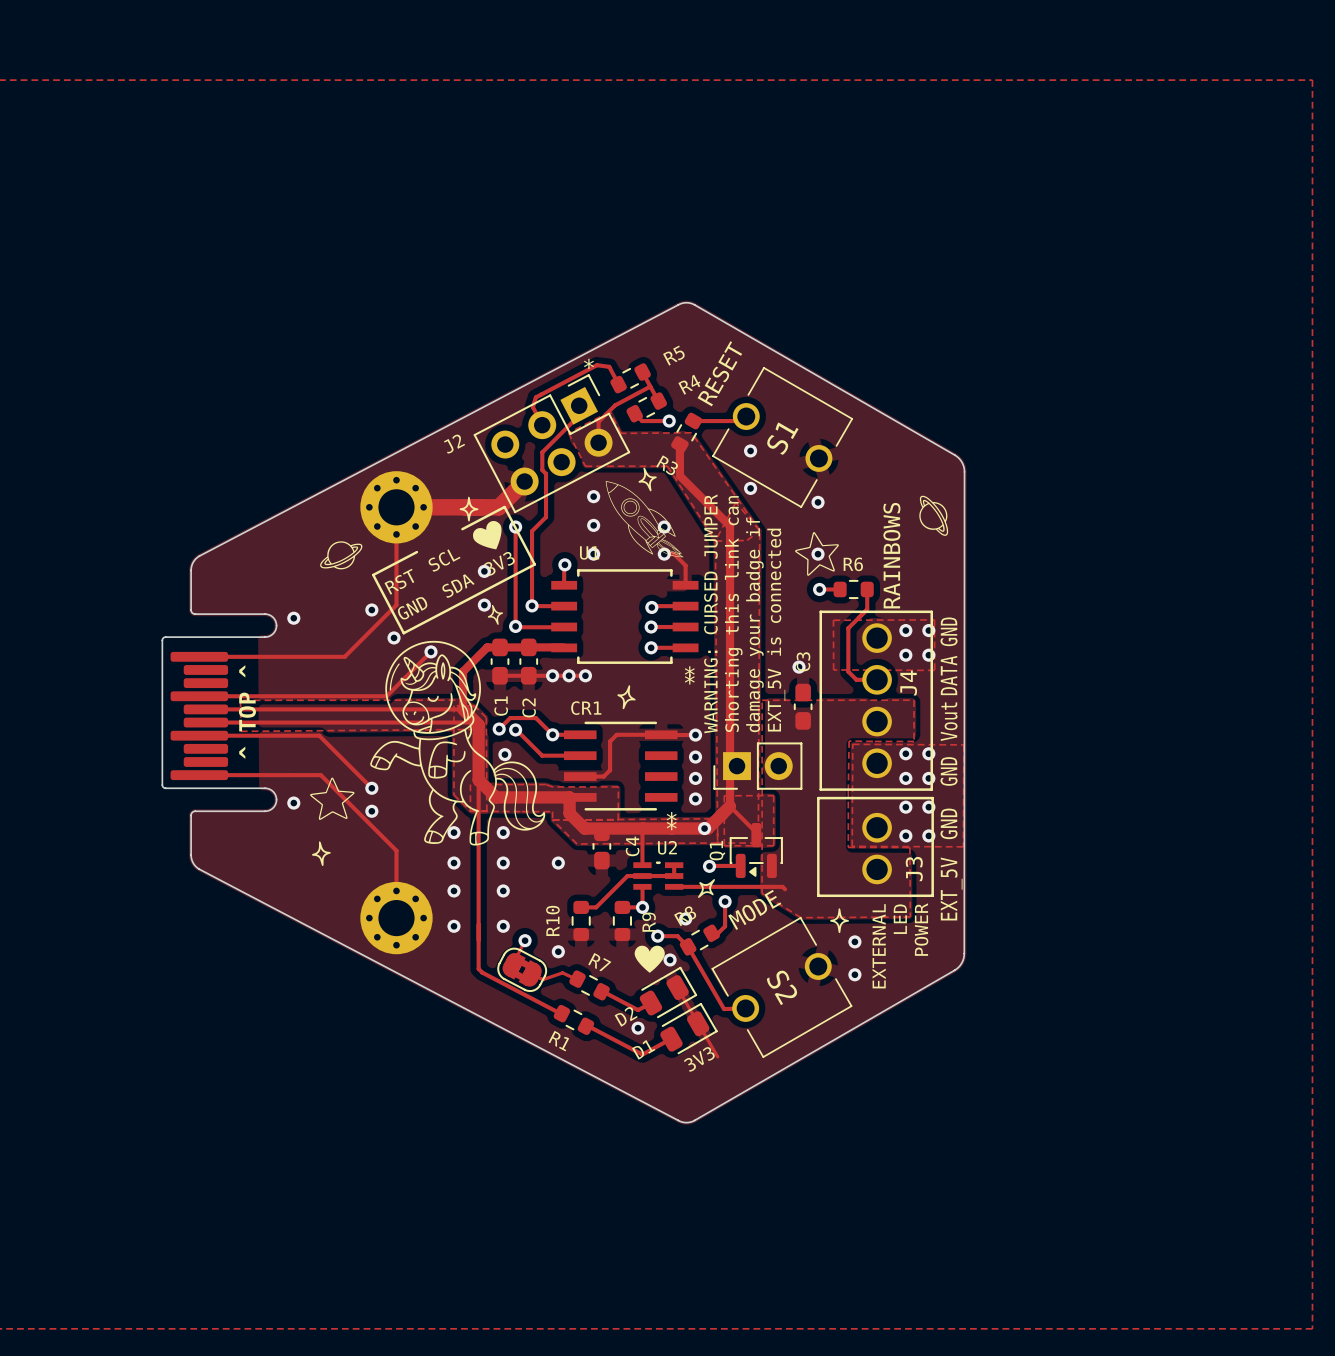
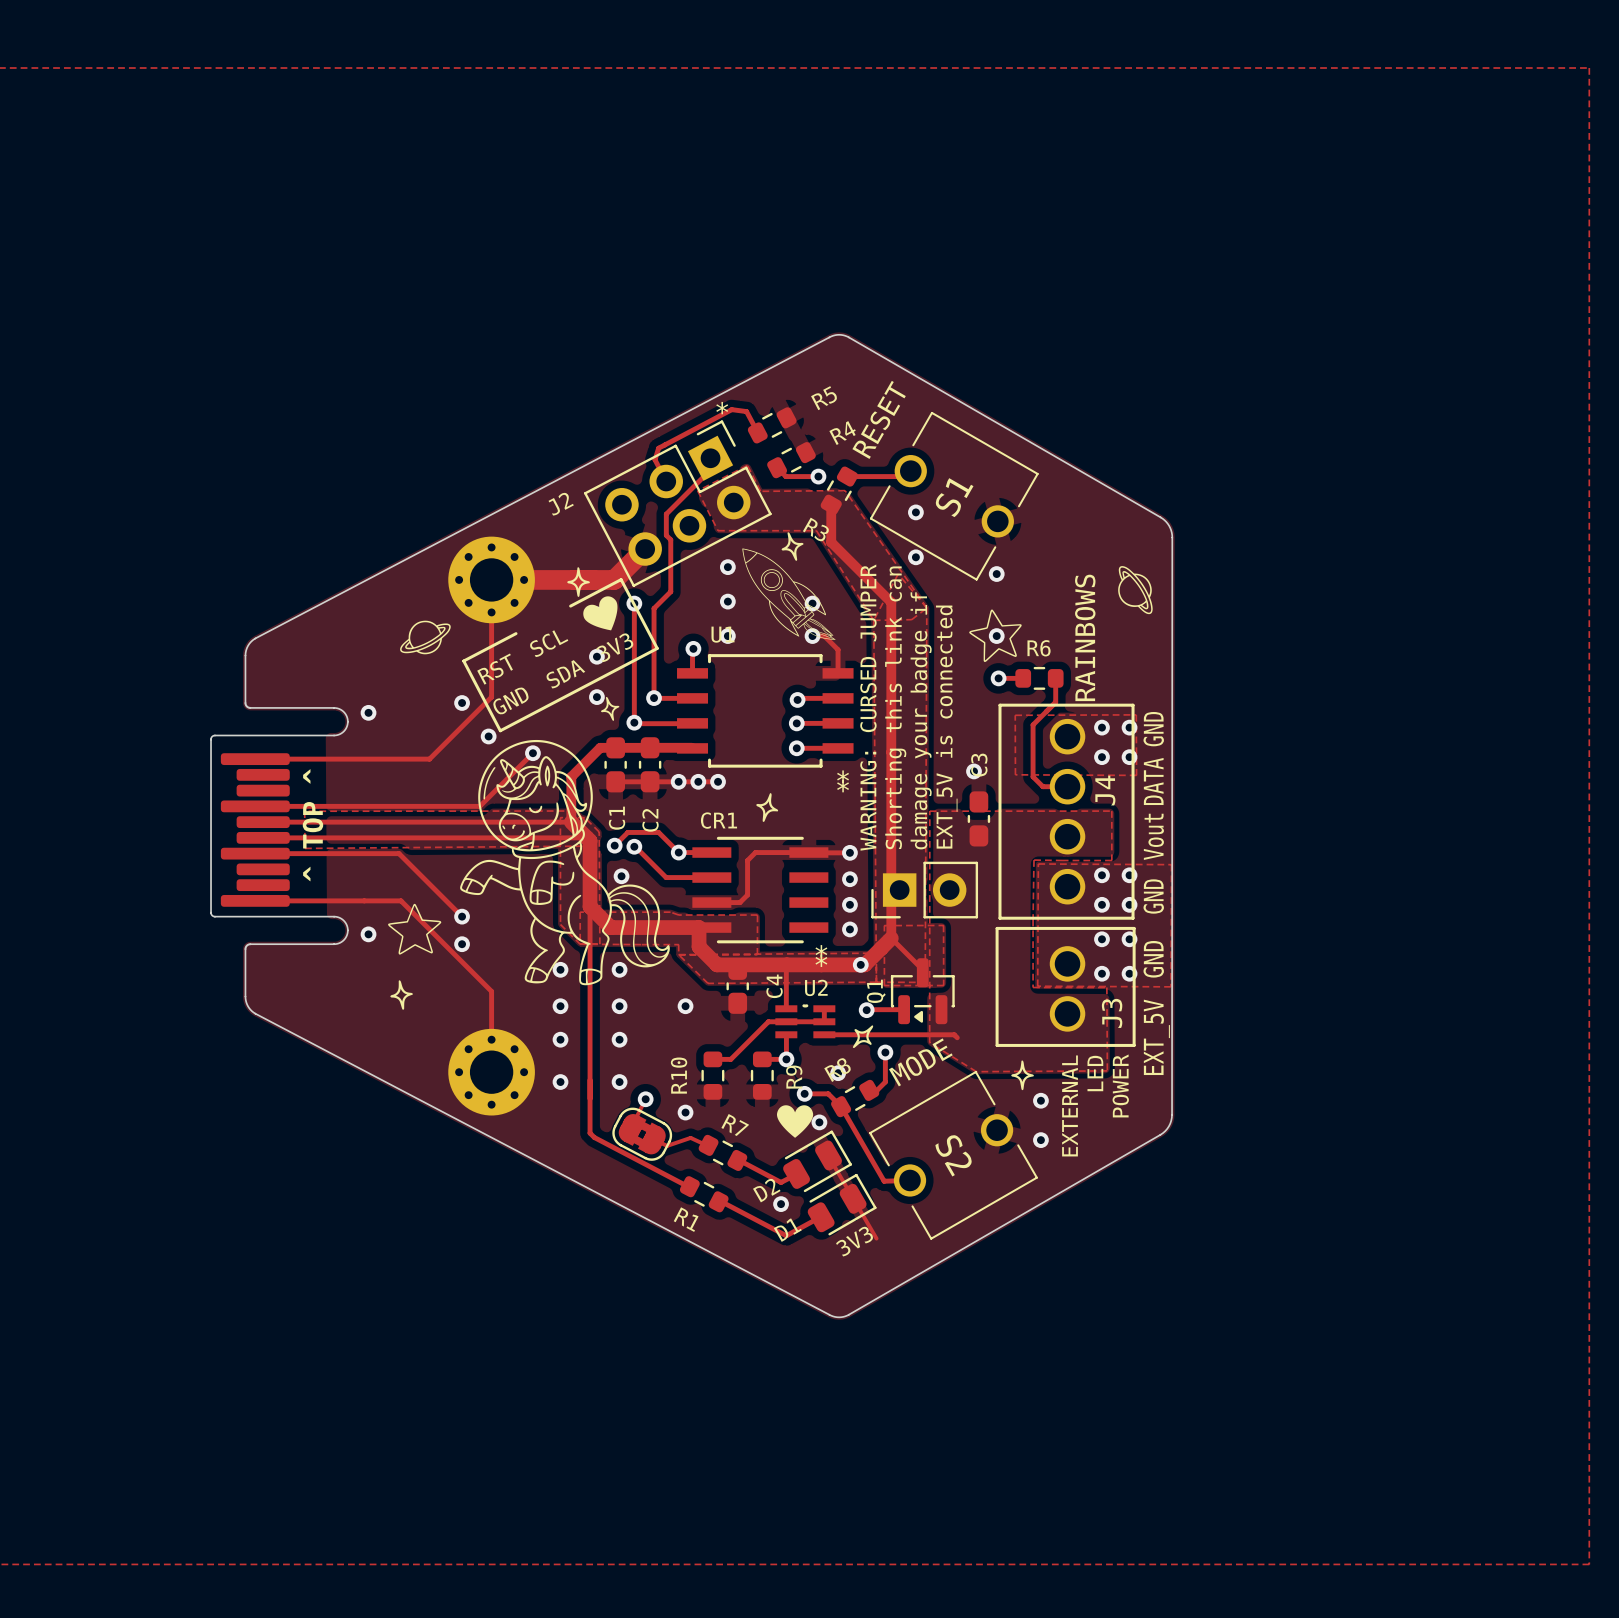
track: (642, 371) (658, 401) -> none
track: (650, 386) (615, 405) (598, 421) (598, 442) (603, 437) -> none

